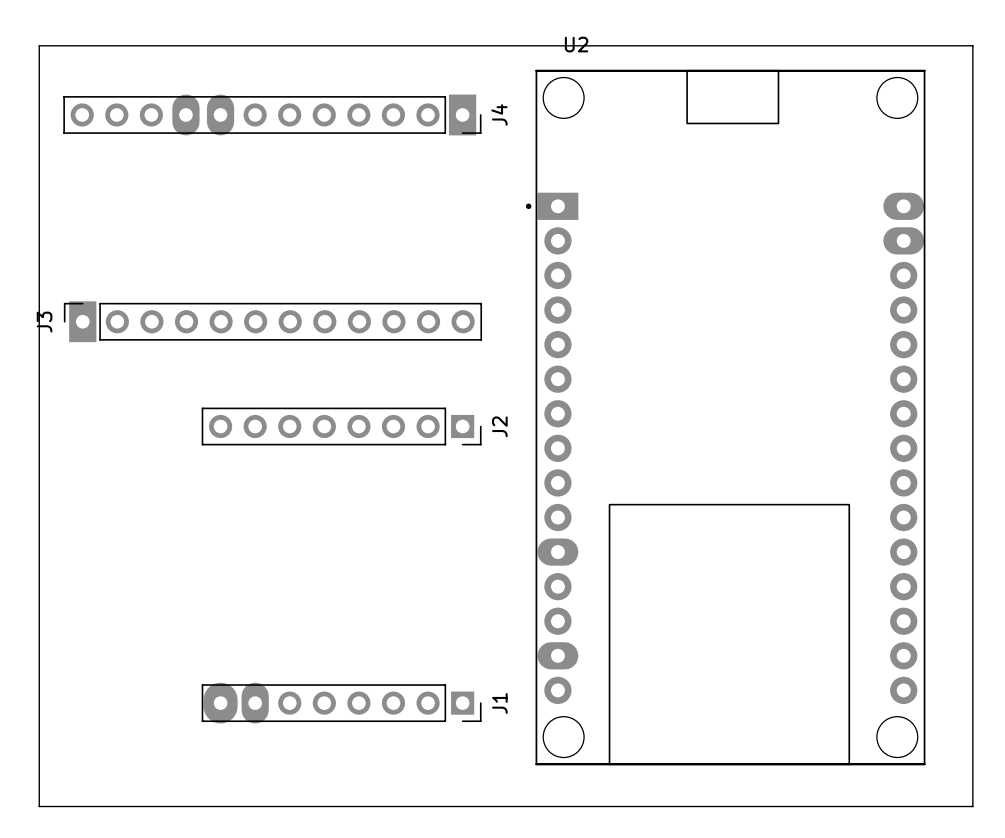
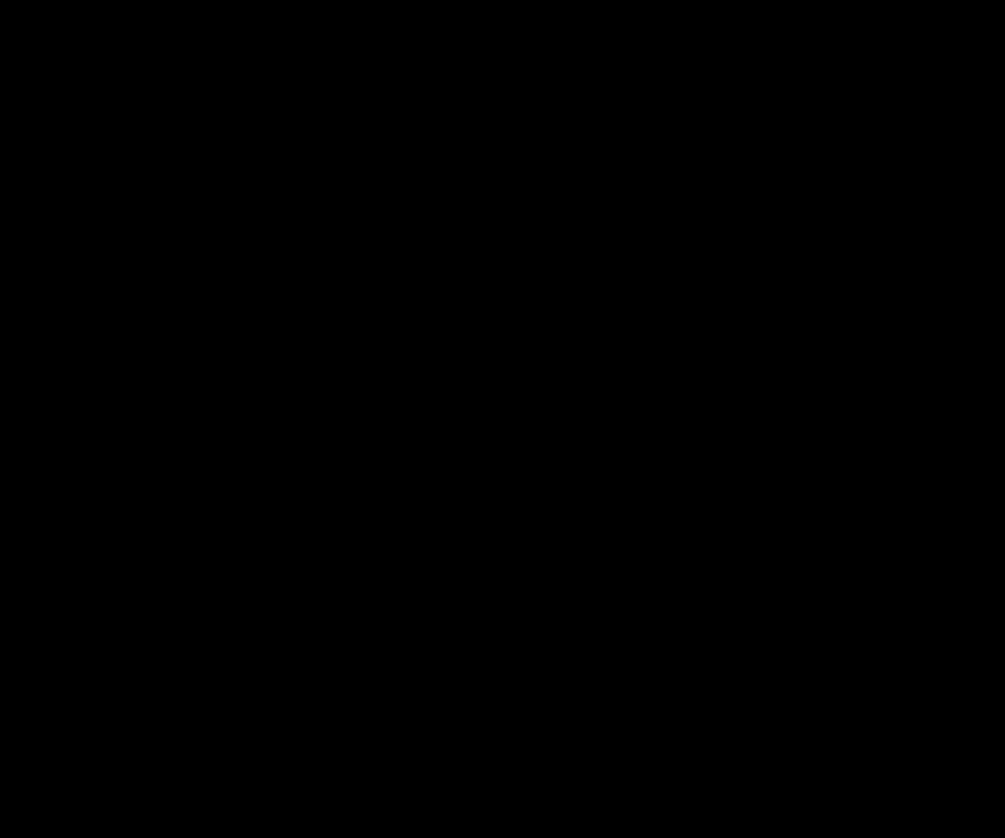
board edge: (39, 45) (972, 45) (972, 806) (39, 806) (39, 45) -> none
J4: (272, 114) -> none
J3: (272, 321) -> none
U2: (725, 417) -> none
J2: (341, 426) -> none
J1: (341, 703) -> none

